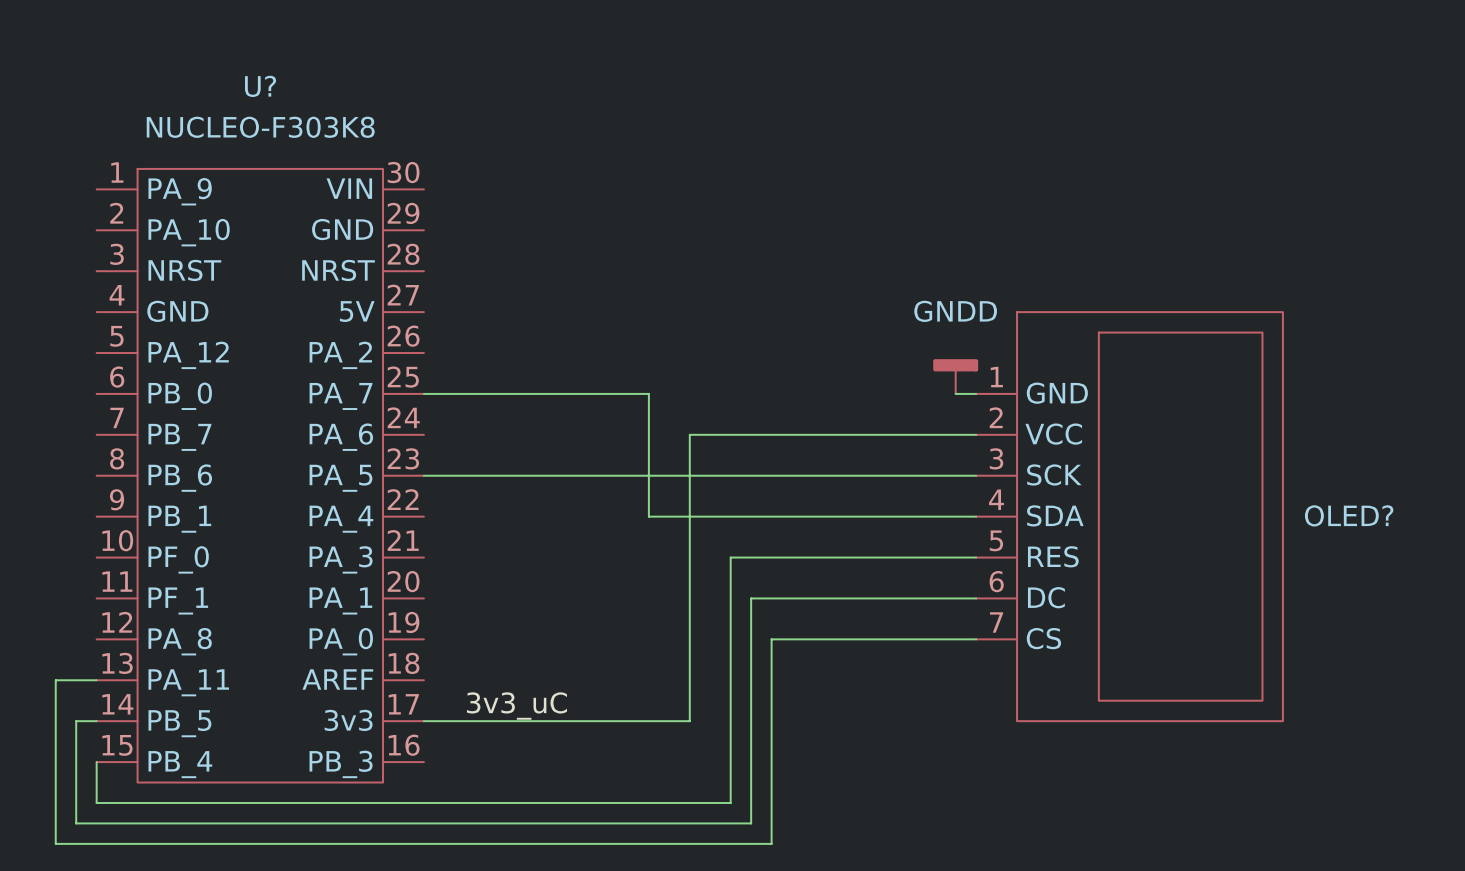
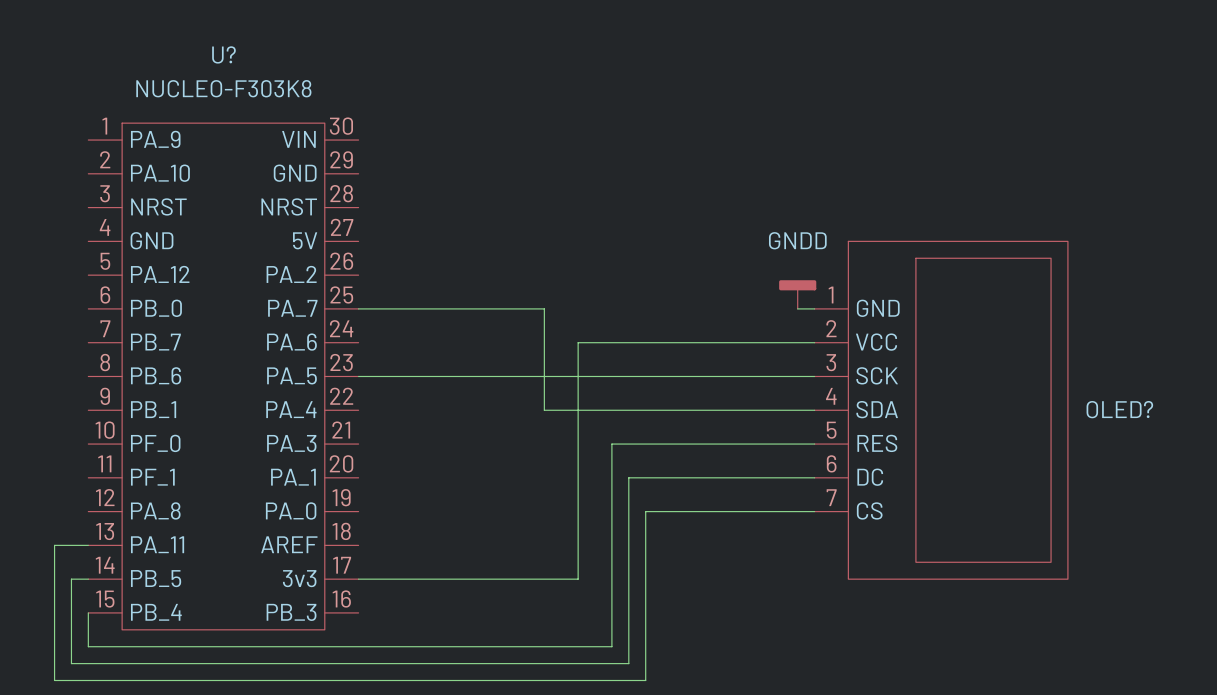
label: 3v3_uC (516, 706) -> none

